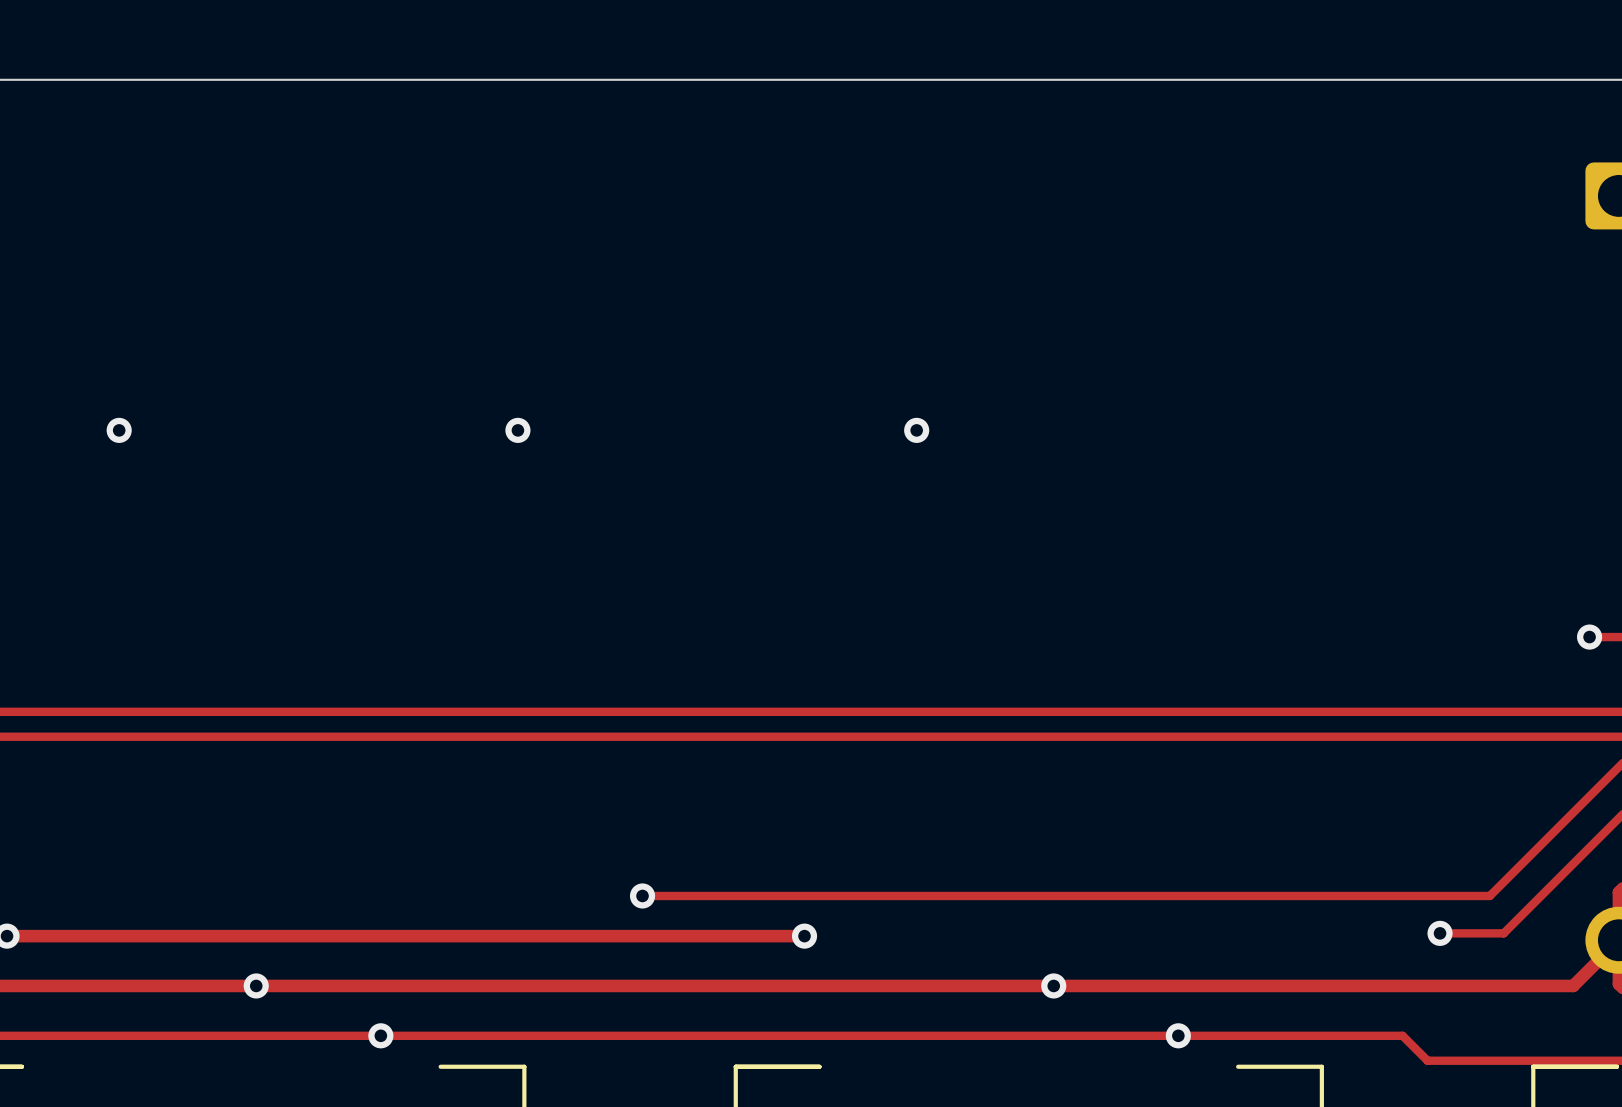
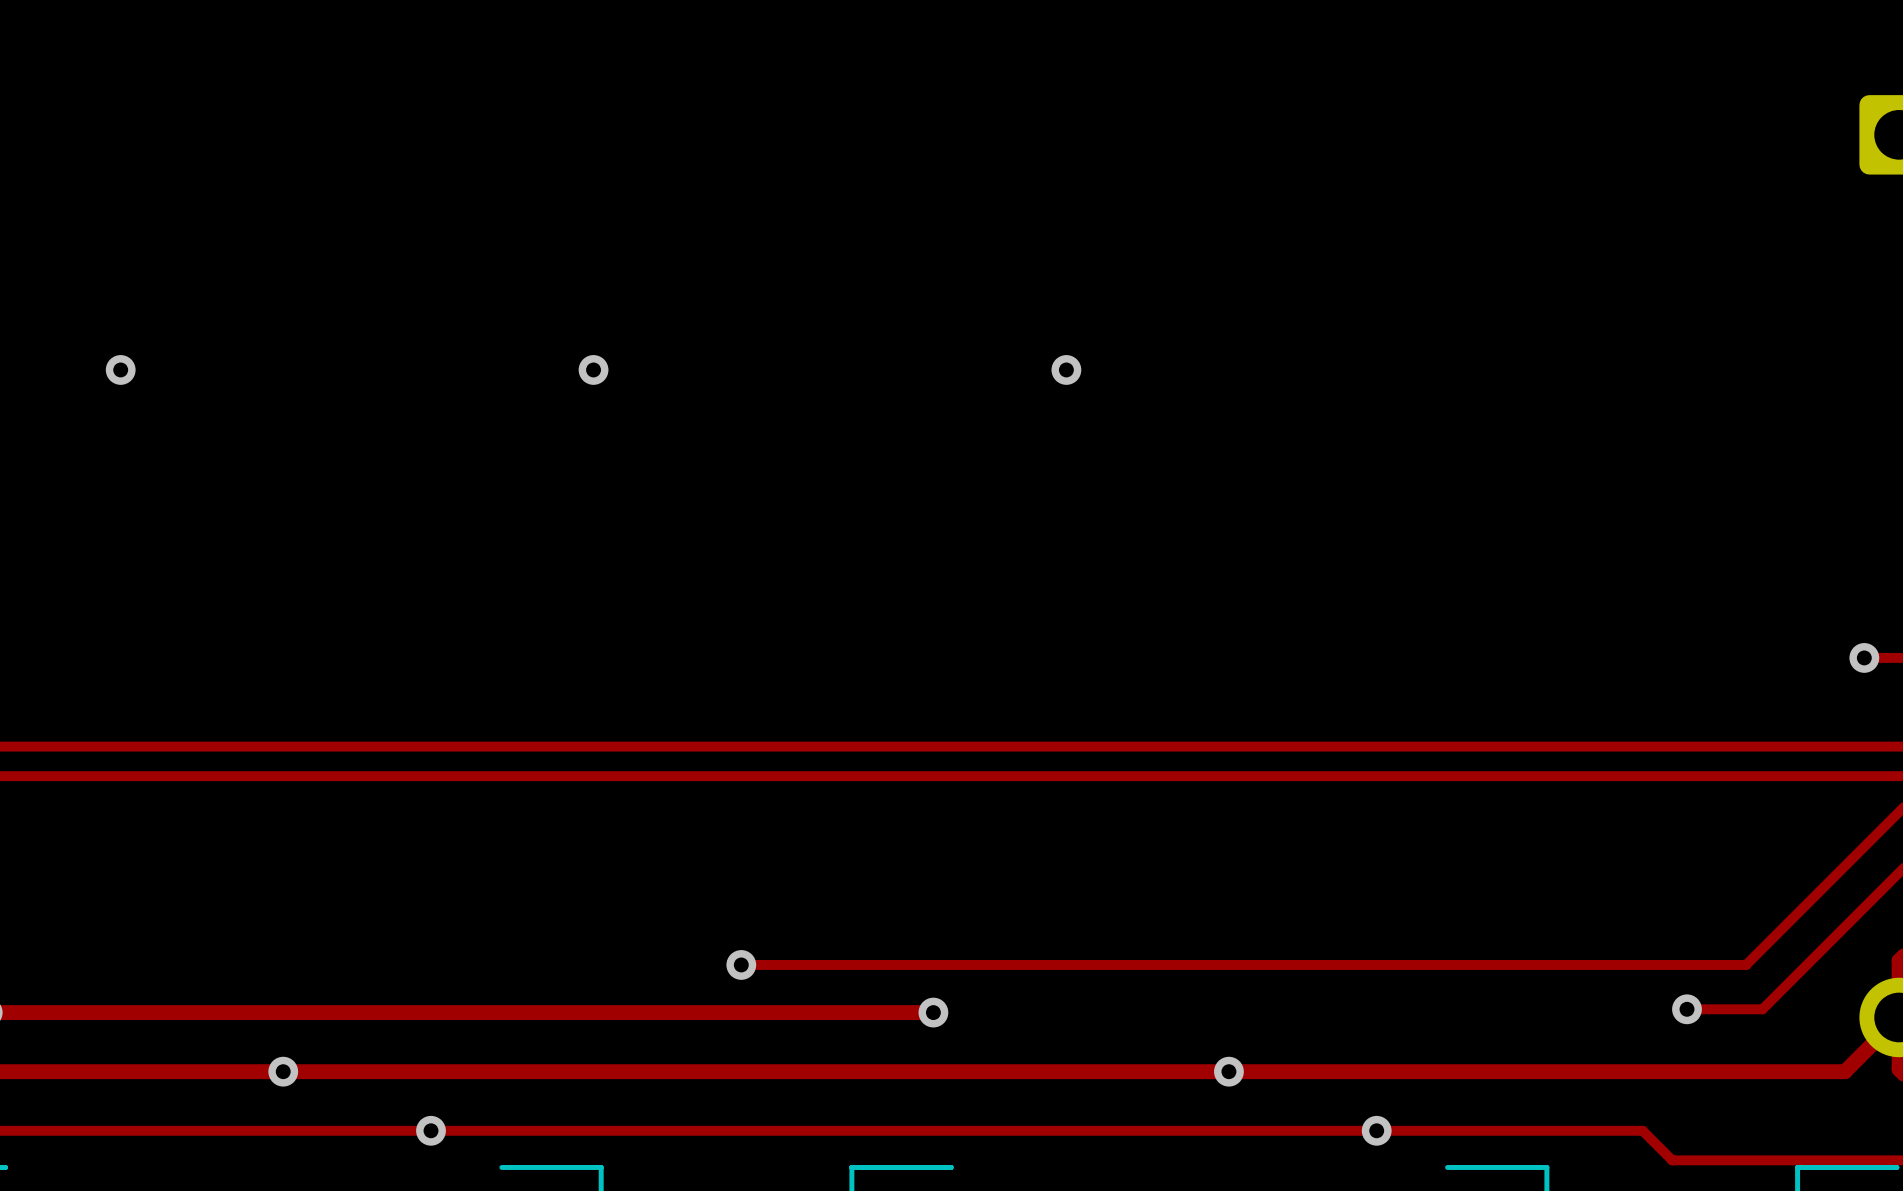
via position: (119, 430) -> (120, 369)
via position: (517, 430) -> (593, 369)
via position: (916, 430) -> (1066, 369)

